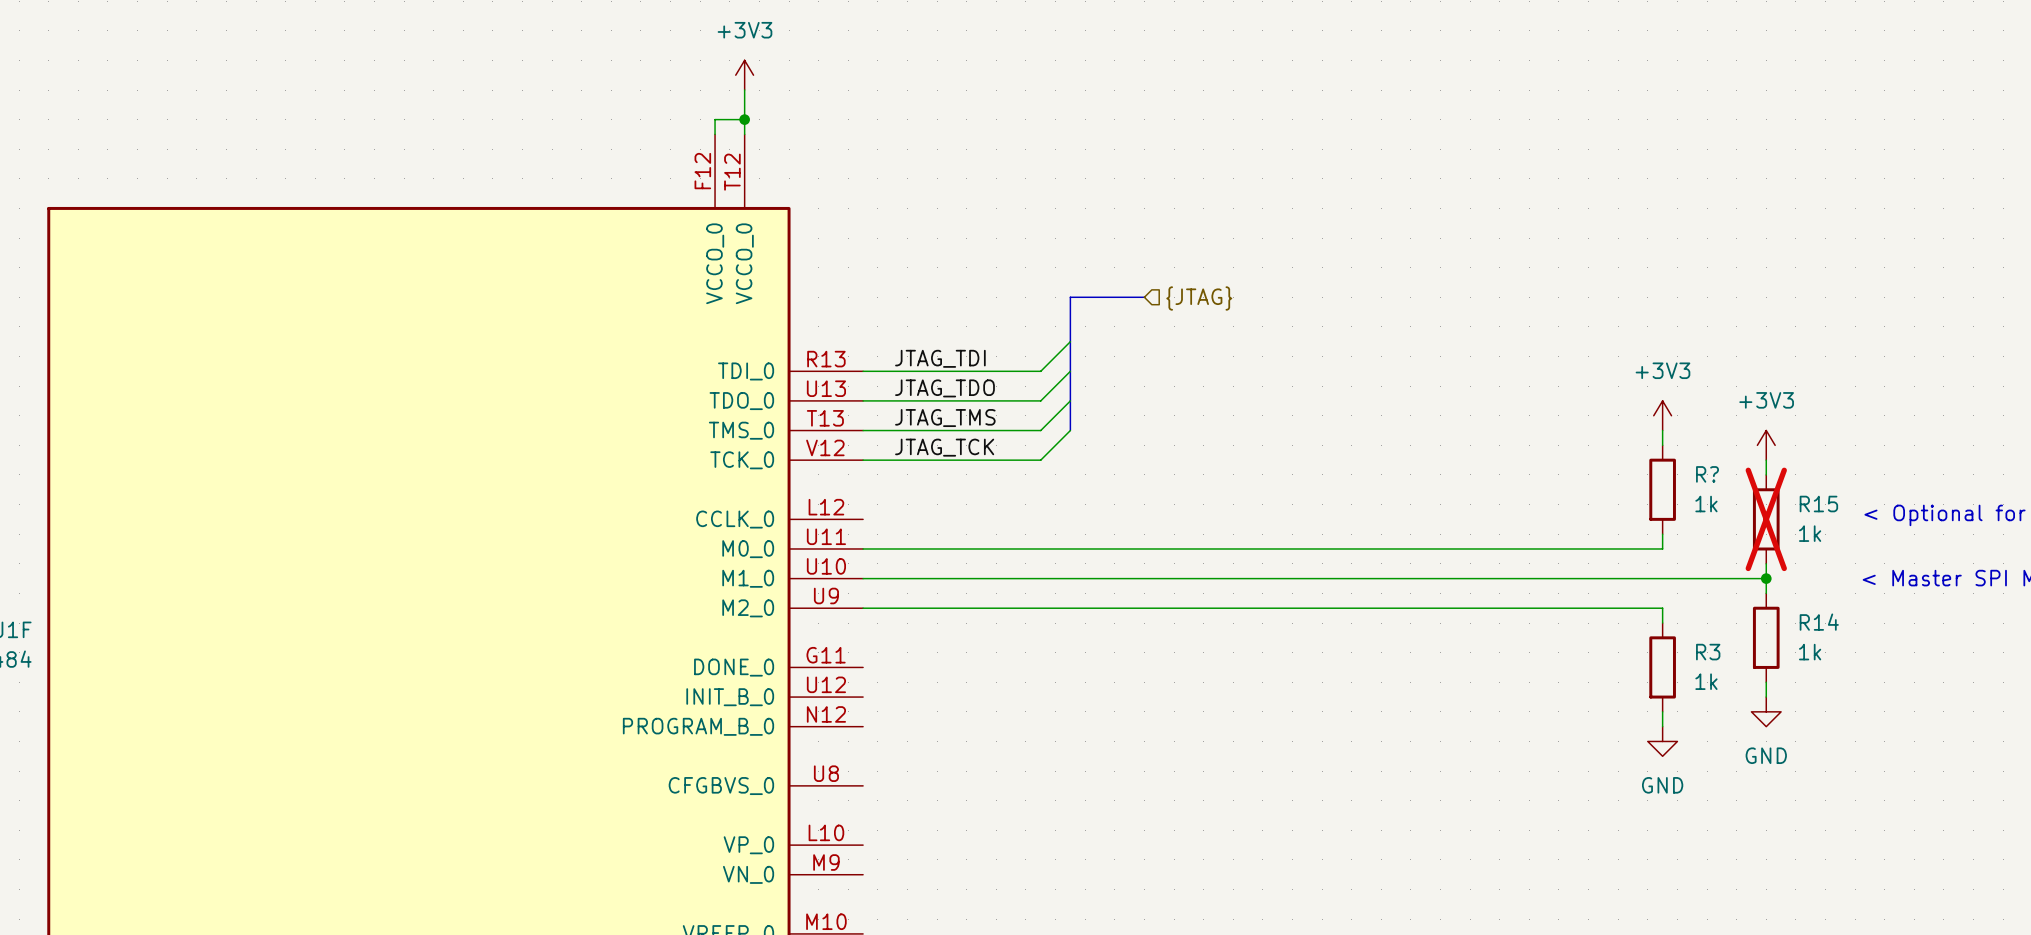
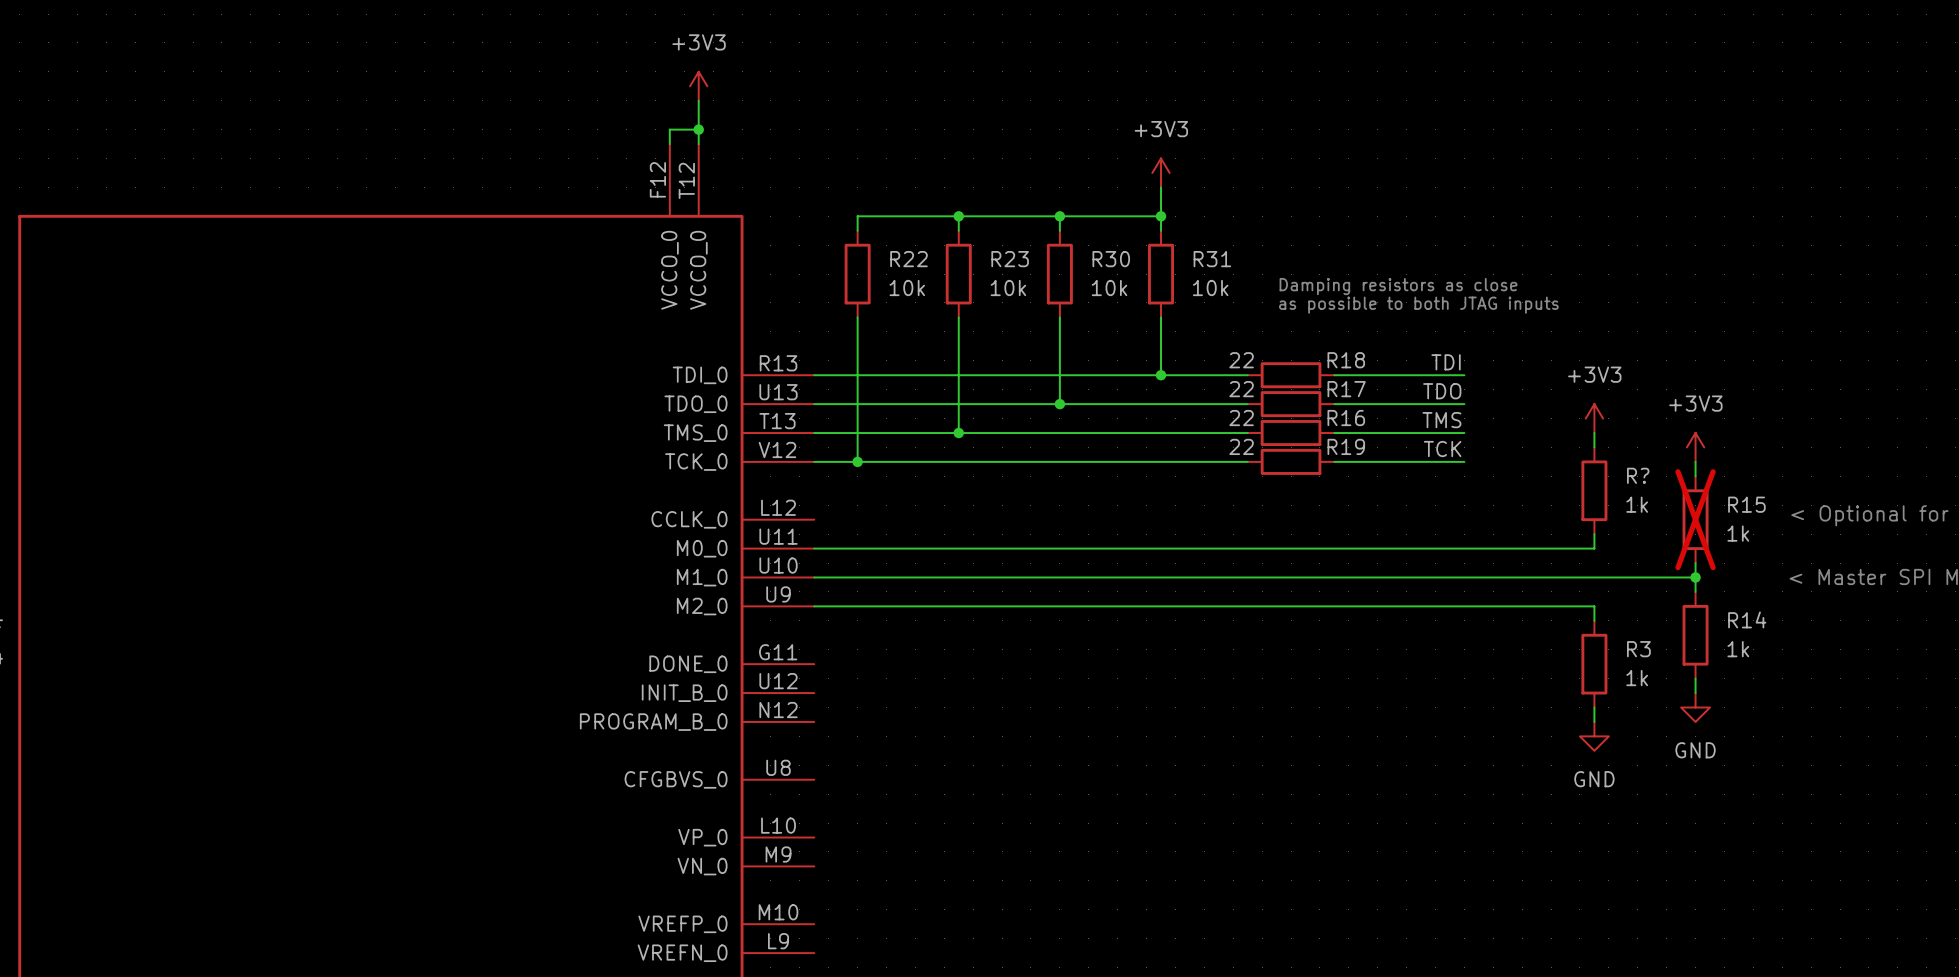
power symbol: none -> +3V3 (1161, 172)
wire: none -> (1161, 187) (1161, 230)
wire: none -> (958, 216) (958, 230)
junction: none -> (958, 216)
wire: none -> (1059, 216) (1059, 230)
junction: none -> (1059, 216)
wire: none -> (1161, 216) (857, 216) (857, 230)
junction: none -> (1161, 216)
R22: none -> 10k (857, 274)
R23: none -> 10k (958, 274)
R30: none -> 10k (1059, 274)
R31: none -> 10k (1161, 274)
text: none -> Damping resistors as close (1398, 286)
bus: (1144, 297) (1070, 297) (1070, 430) -> none
hierarchical label: {JTAG} (1199, 298) -> none
text: none -> as possible to both JTAG inputs (1418, 305)
wire: none -> (857, 317) (857, 461)
wire: none -> (958, 317) (958, 433)
wire: none -> (1059, 317) (1059, 404)
wire: none -> (1161, 317) (1161, 375)
wire: (1070, 341) (1040, 371) -> (1247, 375) (987, 375)
label: JTAG_TDI (940, 358) -> none
label: none -> TDI (1446, 362)
wire: (1070, 371) (1040, 400) -> (1247, 404) (987, 404)
junction: none -> (1161, 375)
R18: none -> 22 (1291, 375)
wire: none -> (1334, 375) (1464, 375)
label: none -> TDO (1442, 391)
label: JTAG_TDO (944, 388) -> none
wire: (1070, 400) (1040, 430) -> (1247, 433) (987, 433)
junction: none -> (1059, 404)
R17: none -> 22 (1291, 404)
wire: none -> (1334, 404) (1464, 404)
label: none -> TMS (1441, 420)
label: JTAG_TMS (945, 418) -> none
junction: none -> (958, 433)
wire: (1070, 430) (1040, 460) -> (1247, 461) (987, 461)
R16: none -> 22 (1291, 433)
wire: none -> (1334, 433) (1464, 433)
label: none -> TCK (1442, 449)
label: JTAG_TCK (944, 447) -> none
junction: none -> (857, 461)
R19: none -> 22 (1291, 461)
wire: none -> (1334, 461) (1464, 461)

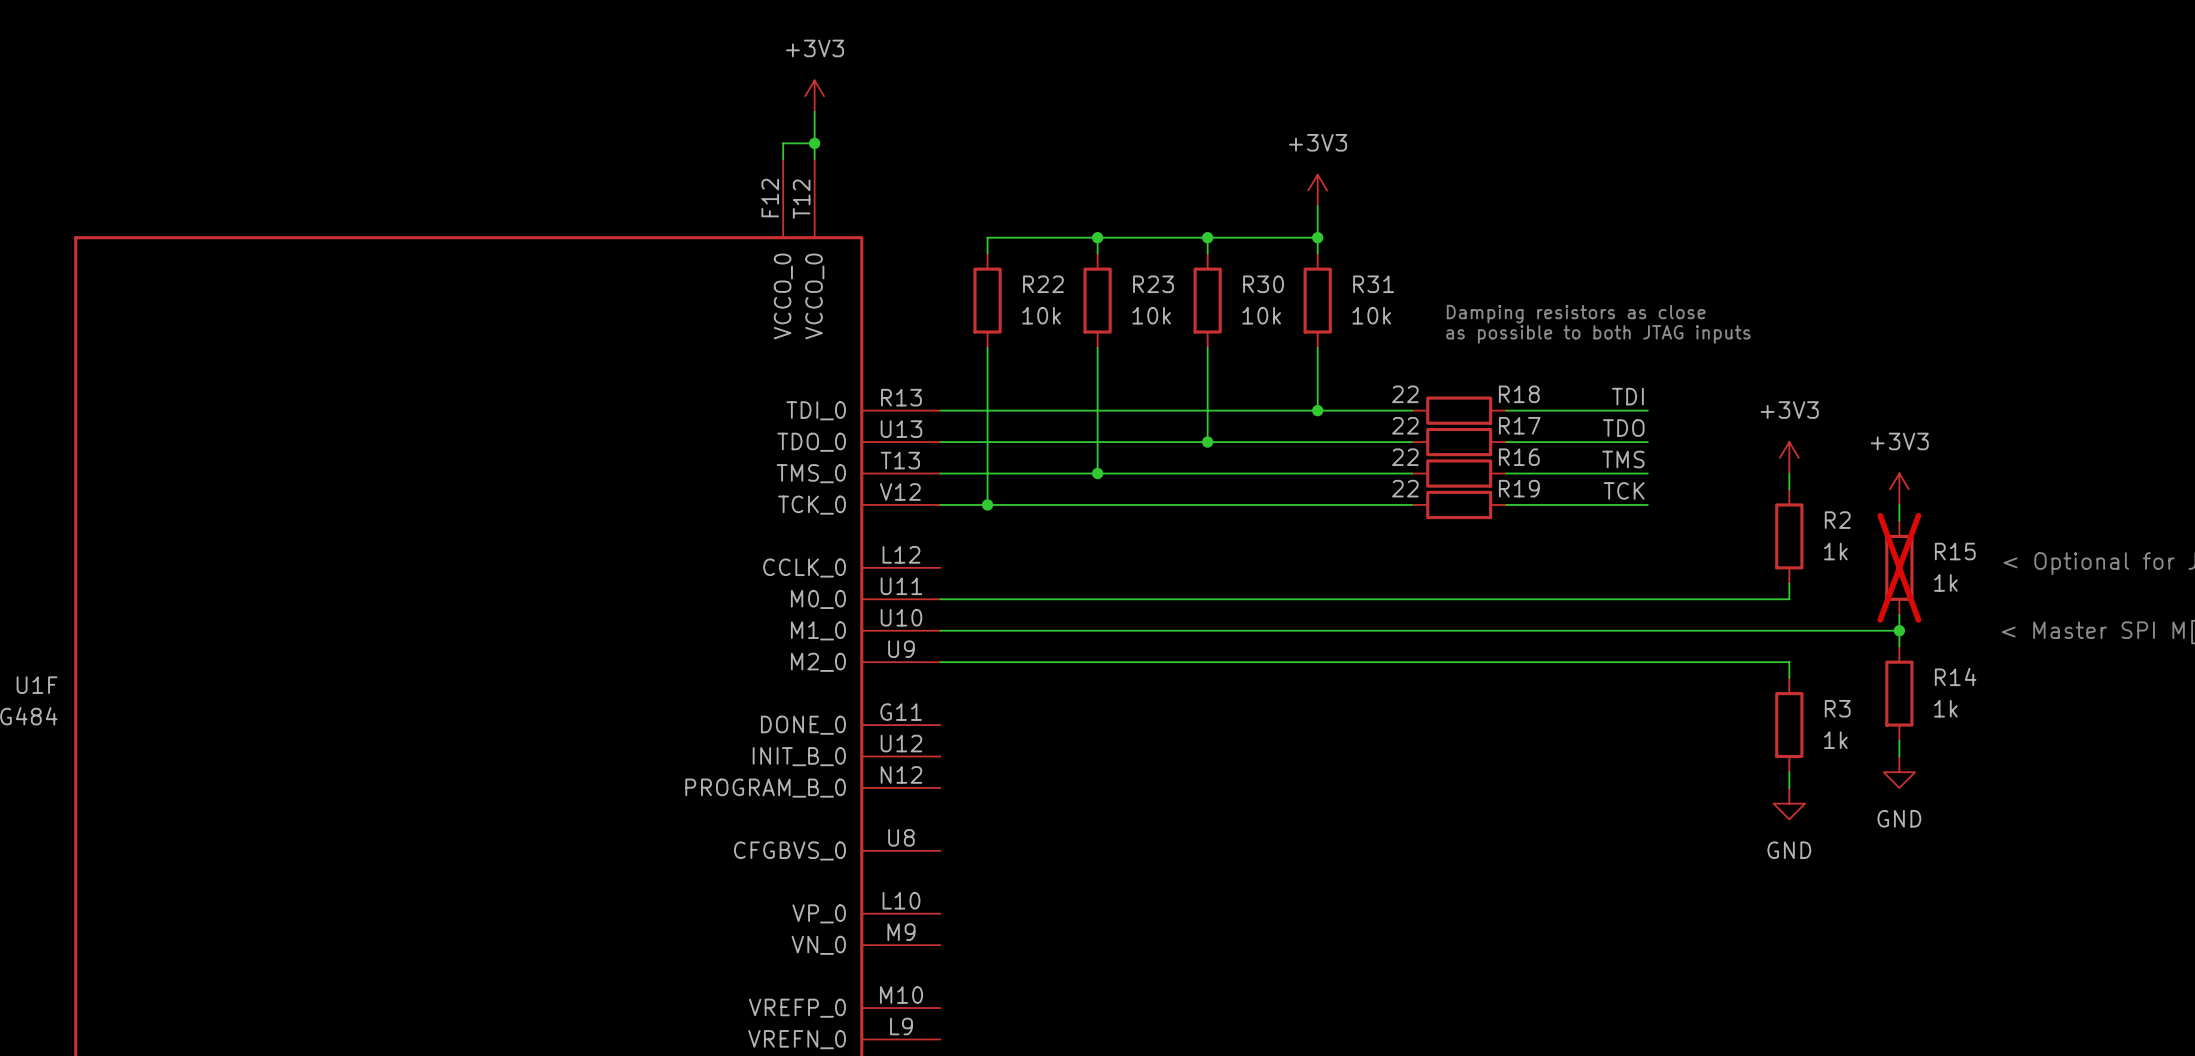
R? name: R? (1638, 475) -> R2 (1837, 520)

